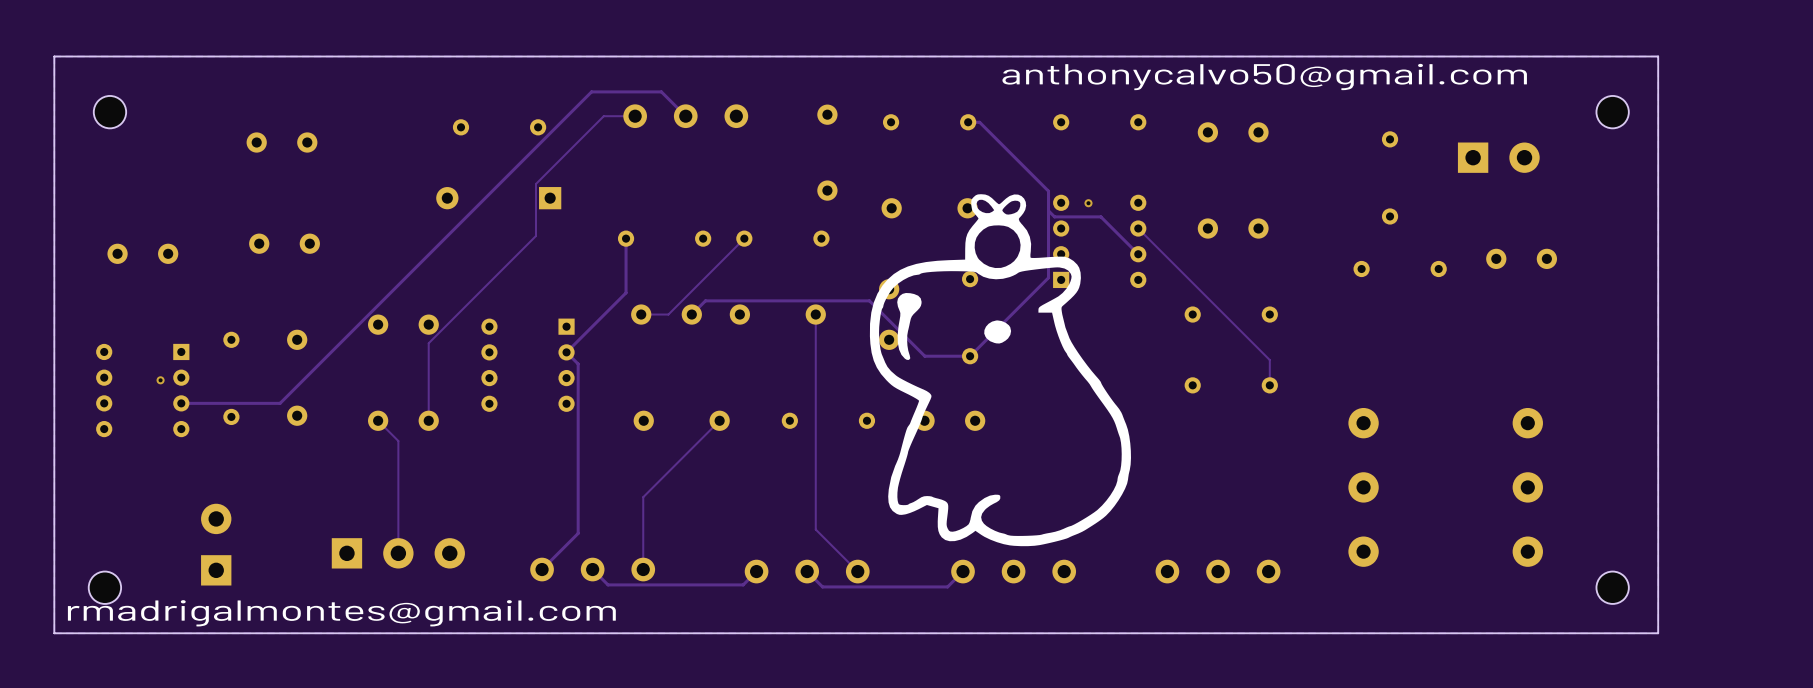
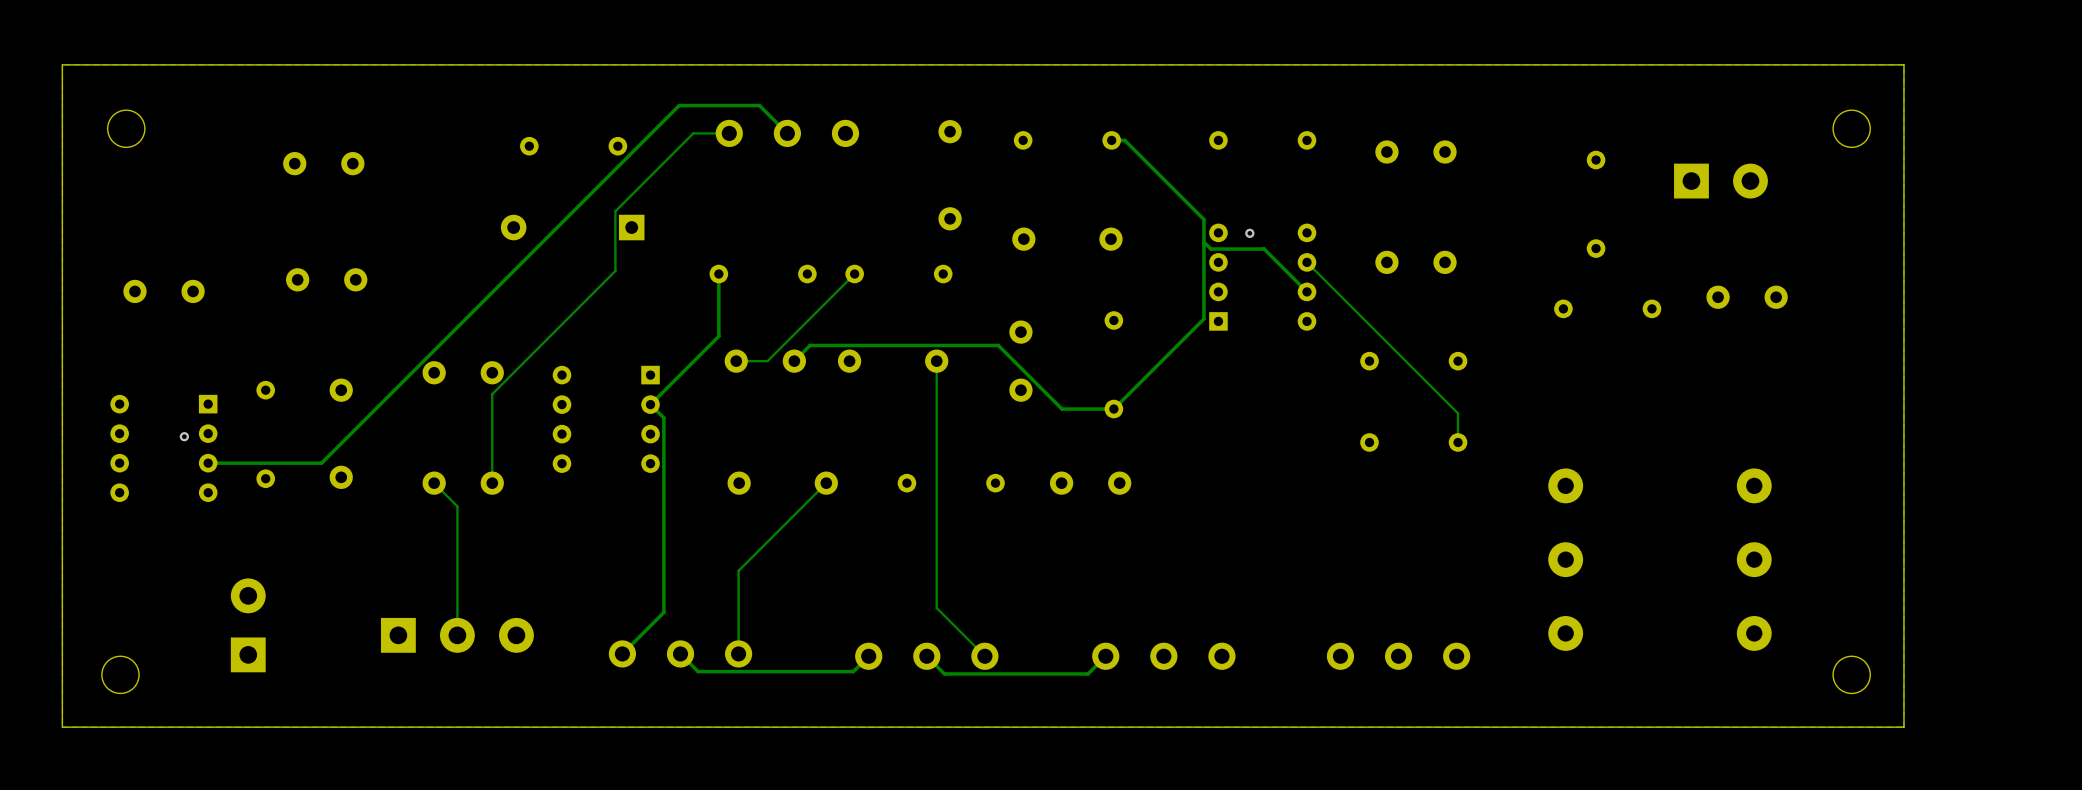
text: anthonycalvo50@gmail.com (1264, 77) -> none
drawing: [869, 194, 1131, 547] -> none
text: rmadrigalmontes@gmail.com (341, 613) -> none

